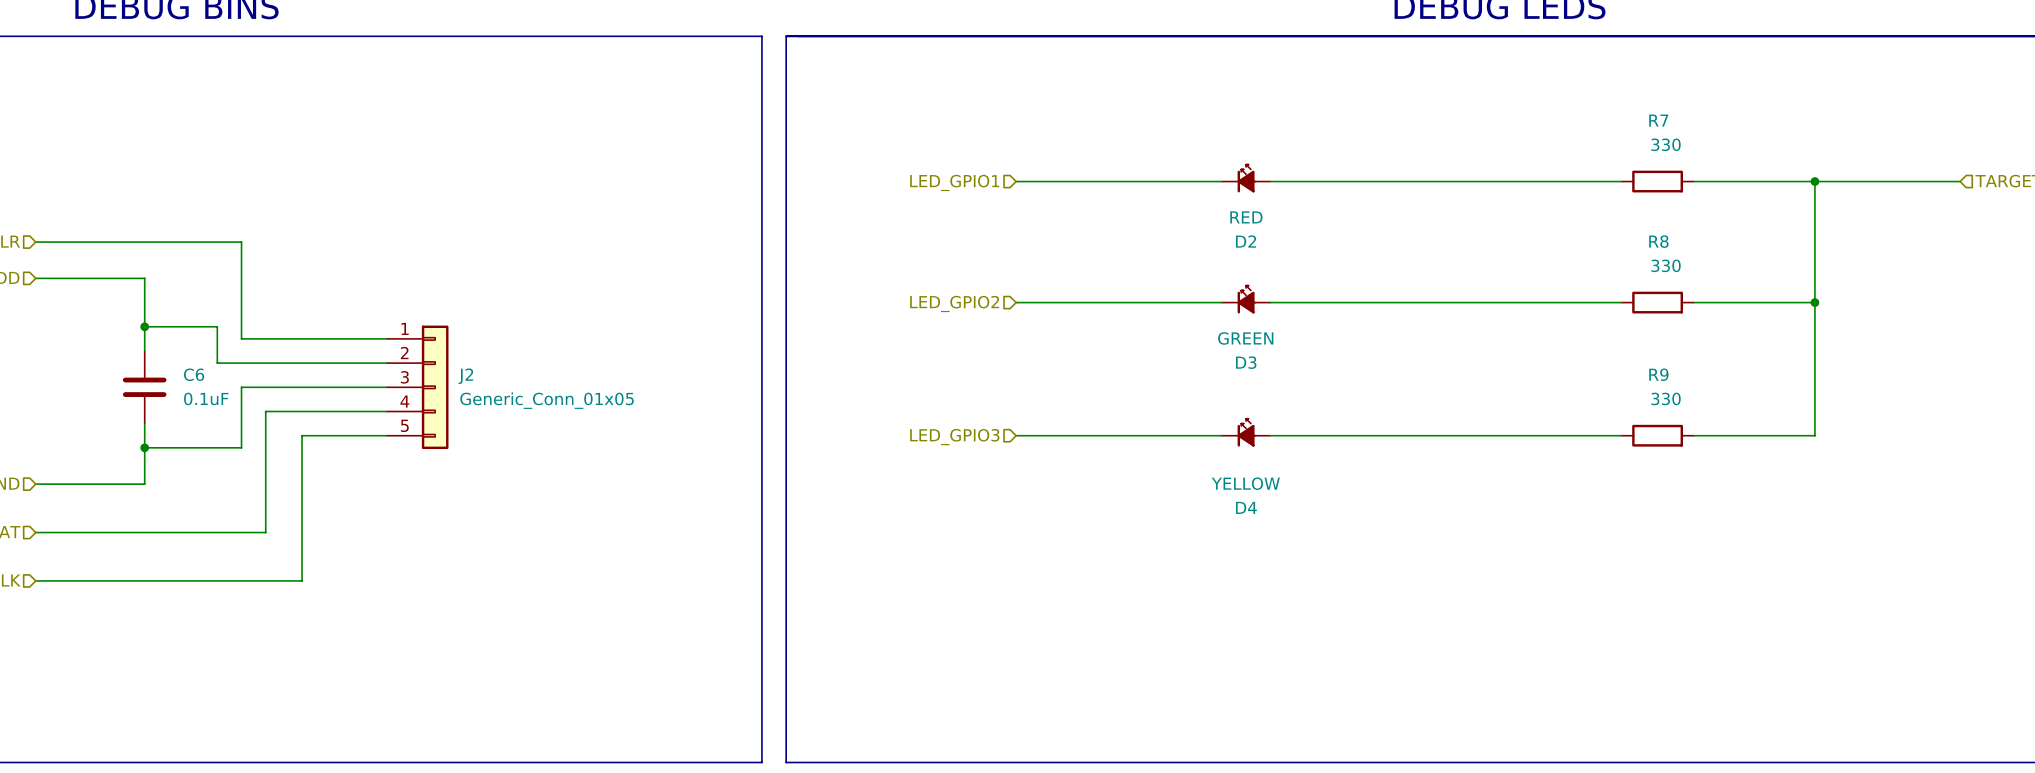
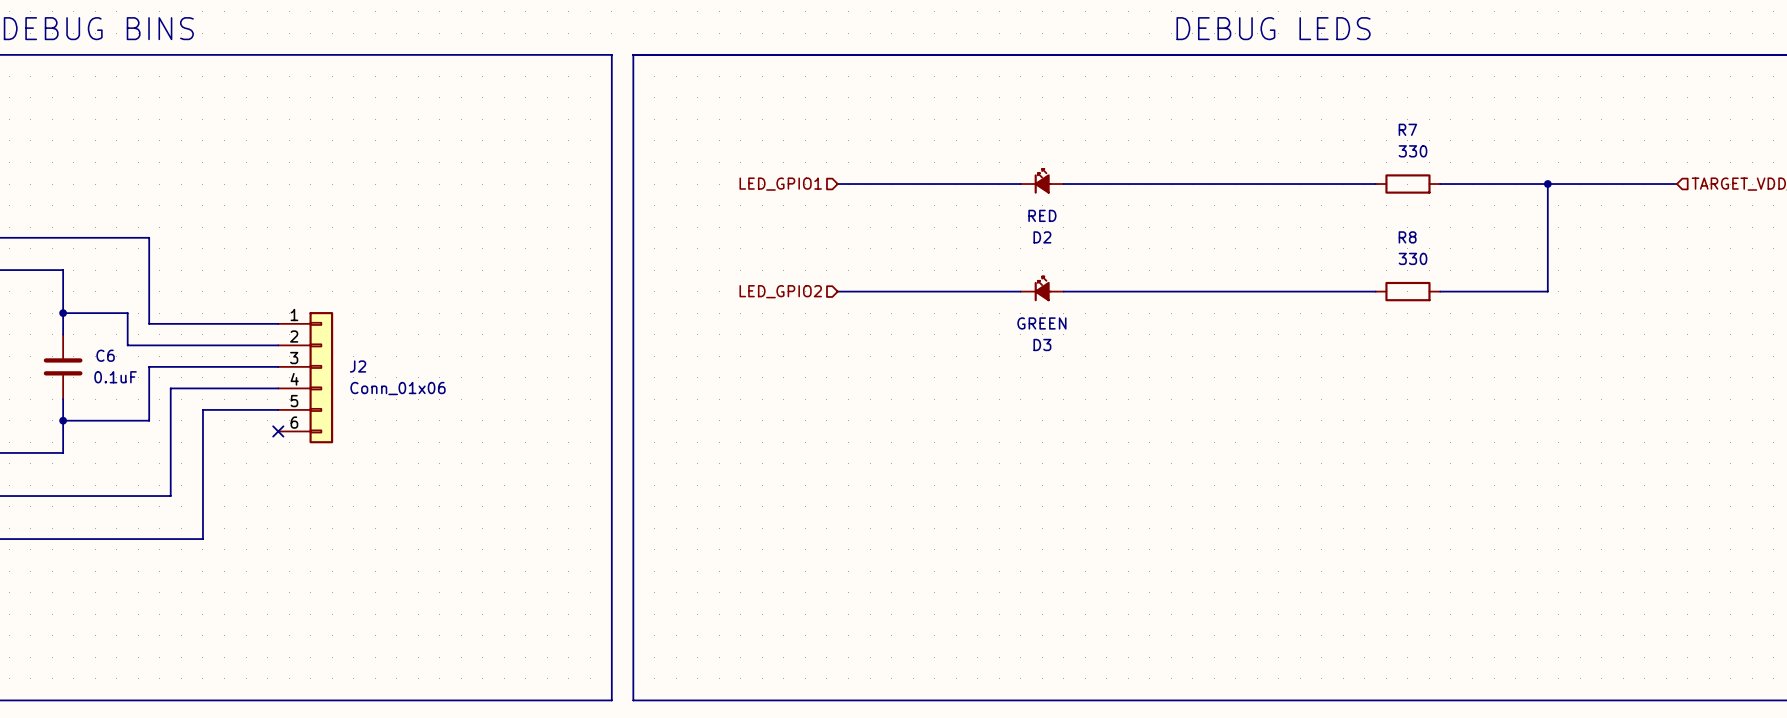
wire: (1814, 302) (1814, 435) (1693, 435) -> none
junction: (1814, 302) -> none
J2 symbol: [386, 325, 449, 450] -> [278, 312, 334, 444]
J2 value: Generic_Conn_01x05 (547, 400) -> Conn_01x06 (398, 388)
D4: YELLOW (1246, 432) -> none
wire: (1016, 435) (1221, 435) -> none
wire: (1270, 435) (1621, 435) -> none
R9: 330 (1657, 435) -> none
hierarchical label: LED_GPIO3 (954, 437) -> none
no-connect mark: none -> (278, 431)

